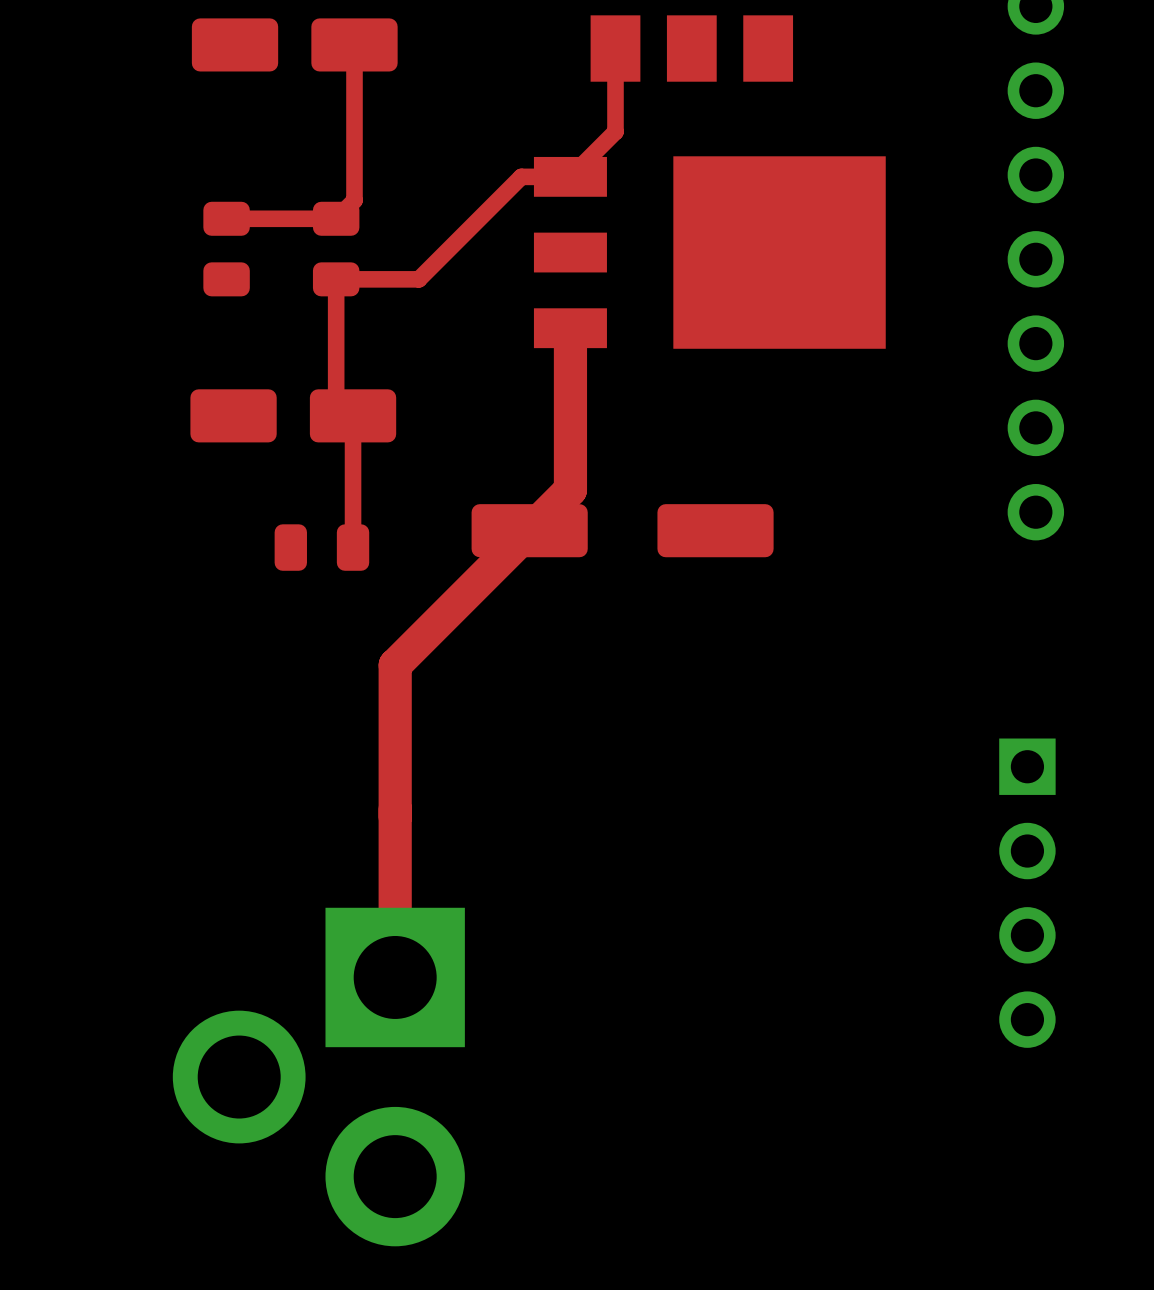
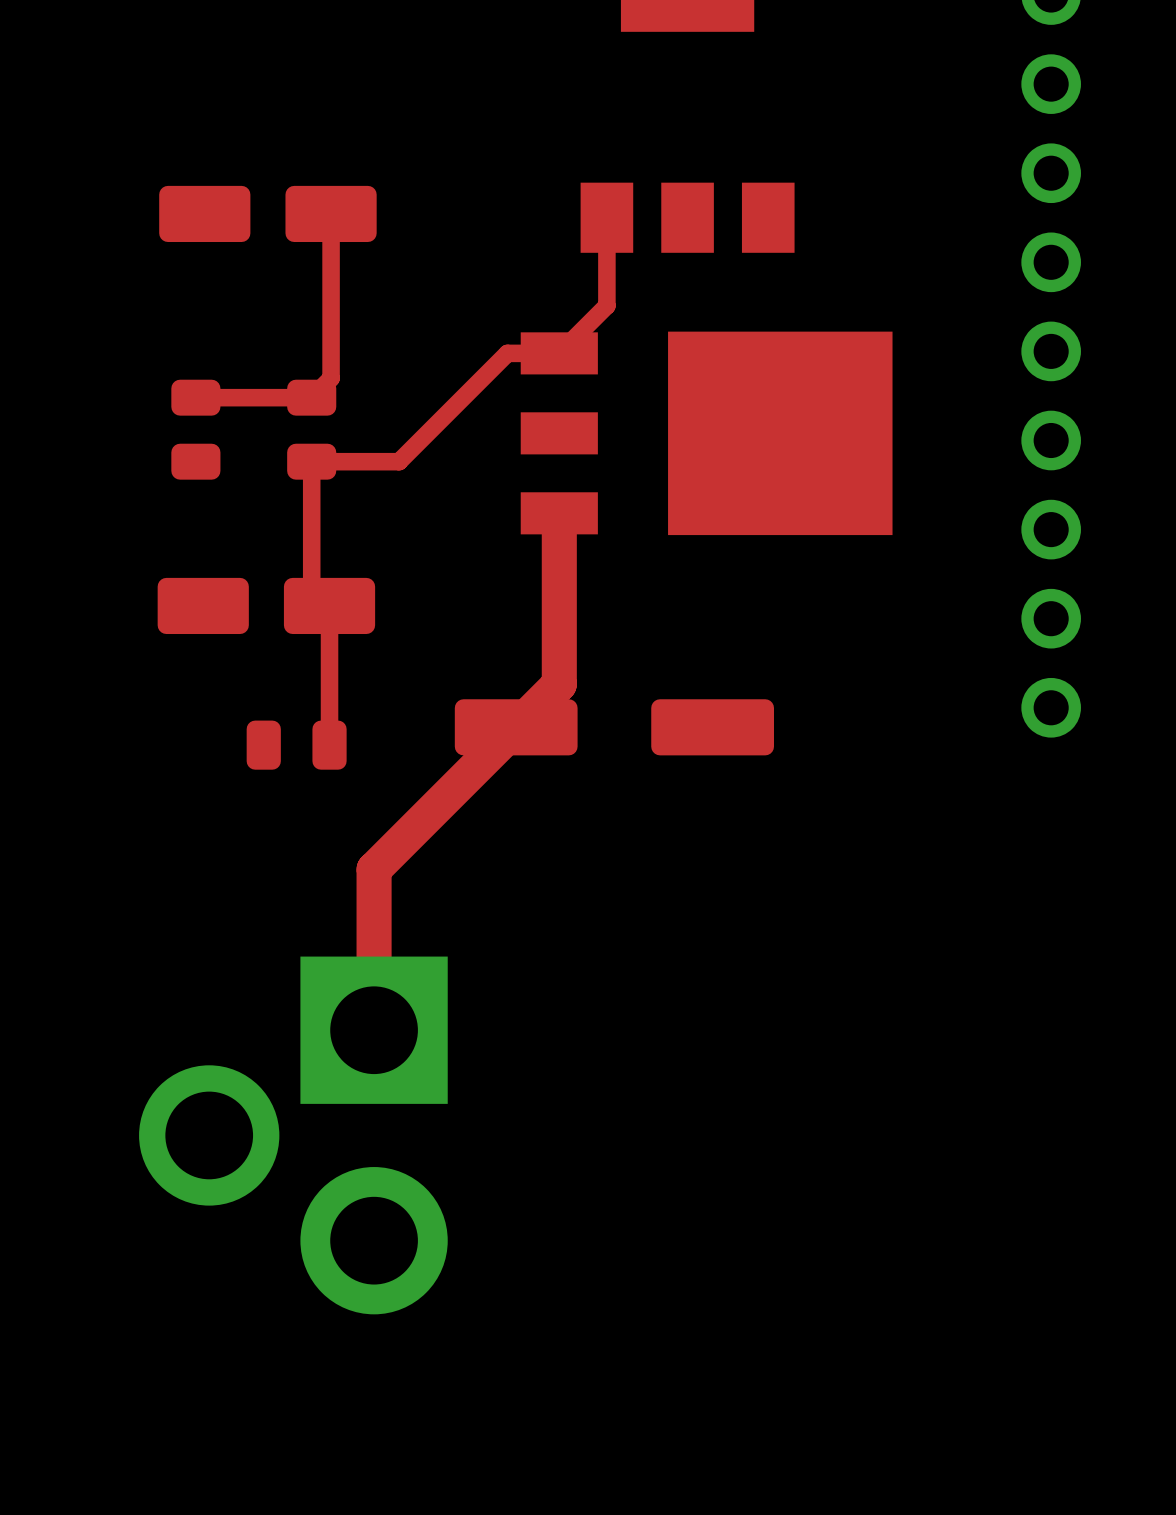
top track: (395, 817) (395, 977) -> none
part: (1027, 893) -> none
part position: (318, 1077) -> (293, 1135)

